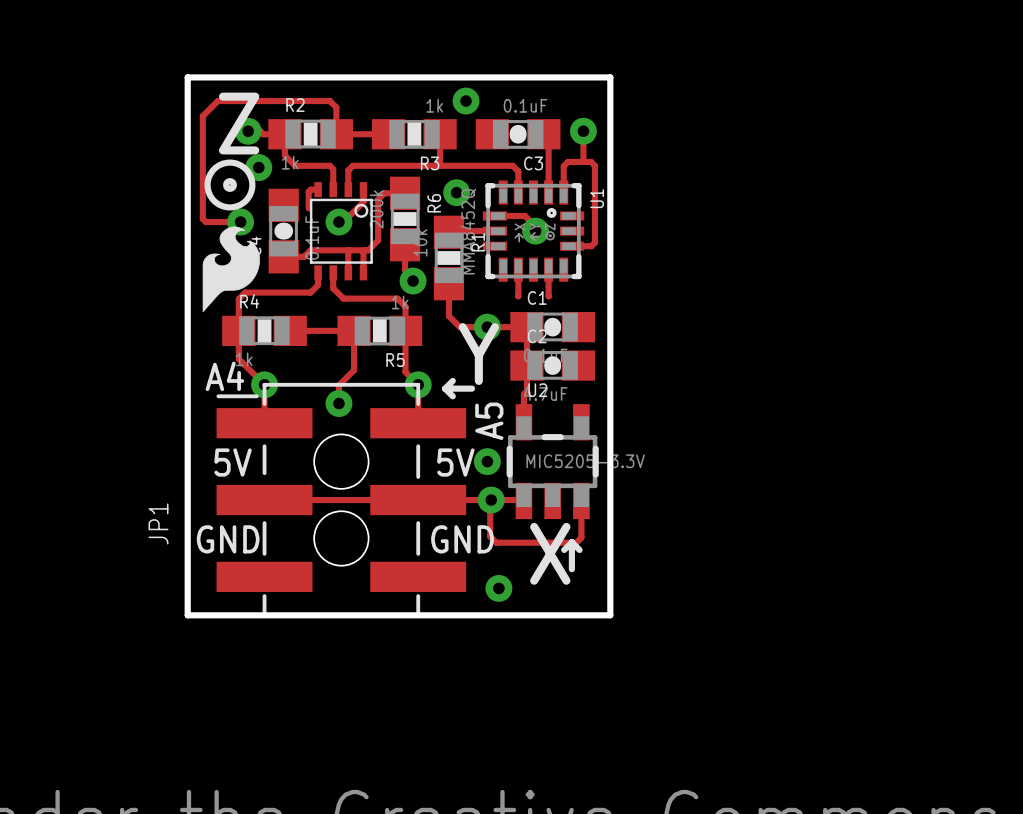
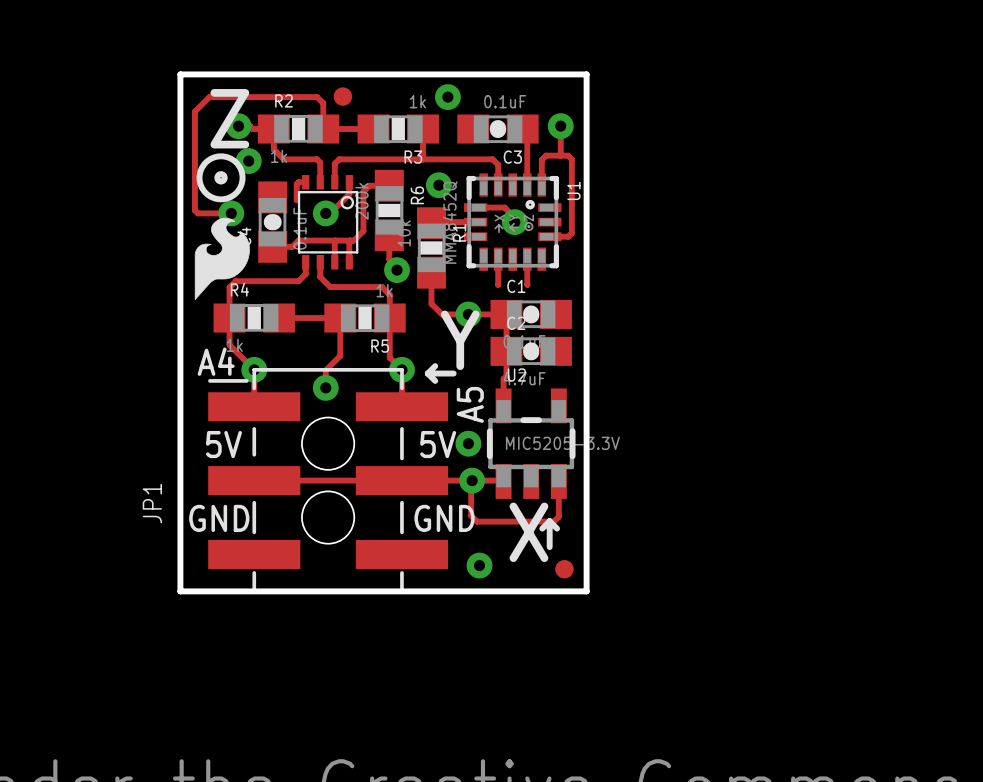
part: none -> (342, 96)
part: none -> (564, 569)

